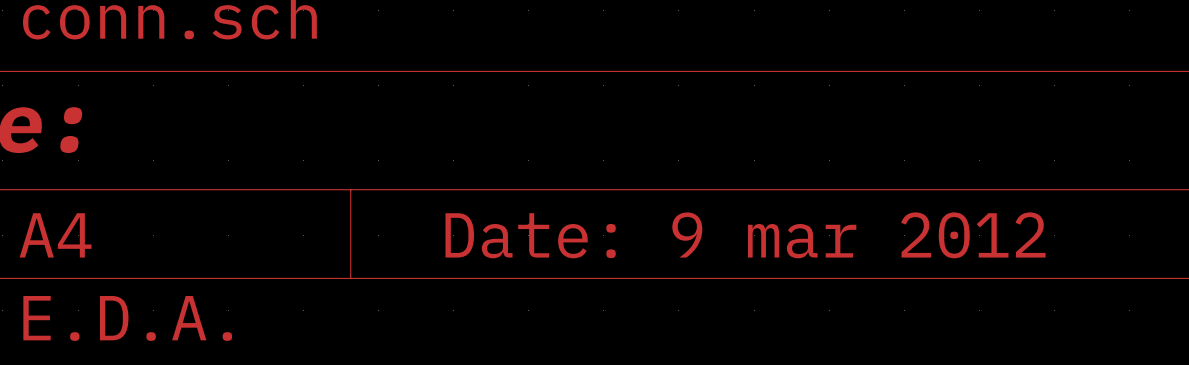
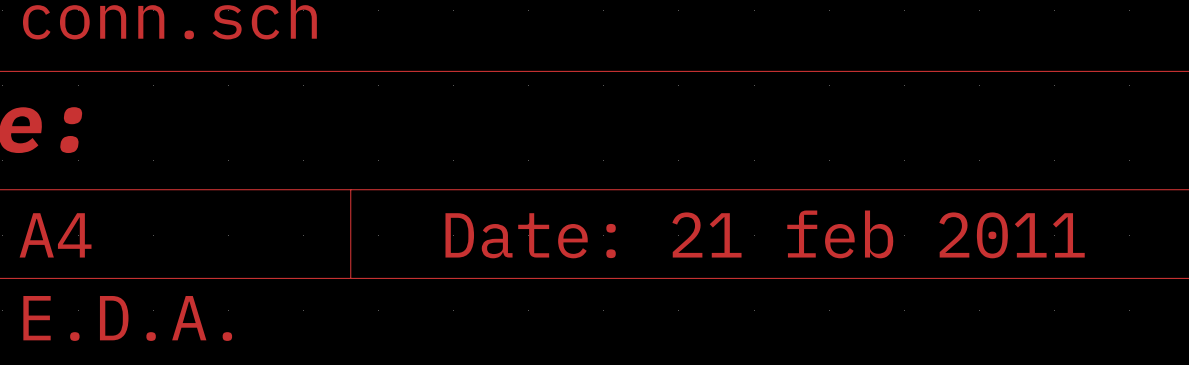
title block: Date: 9 mar 2012 (745, 235) -> Date: 21 feb 2011 (765, 234)

